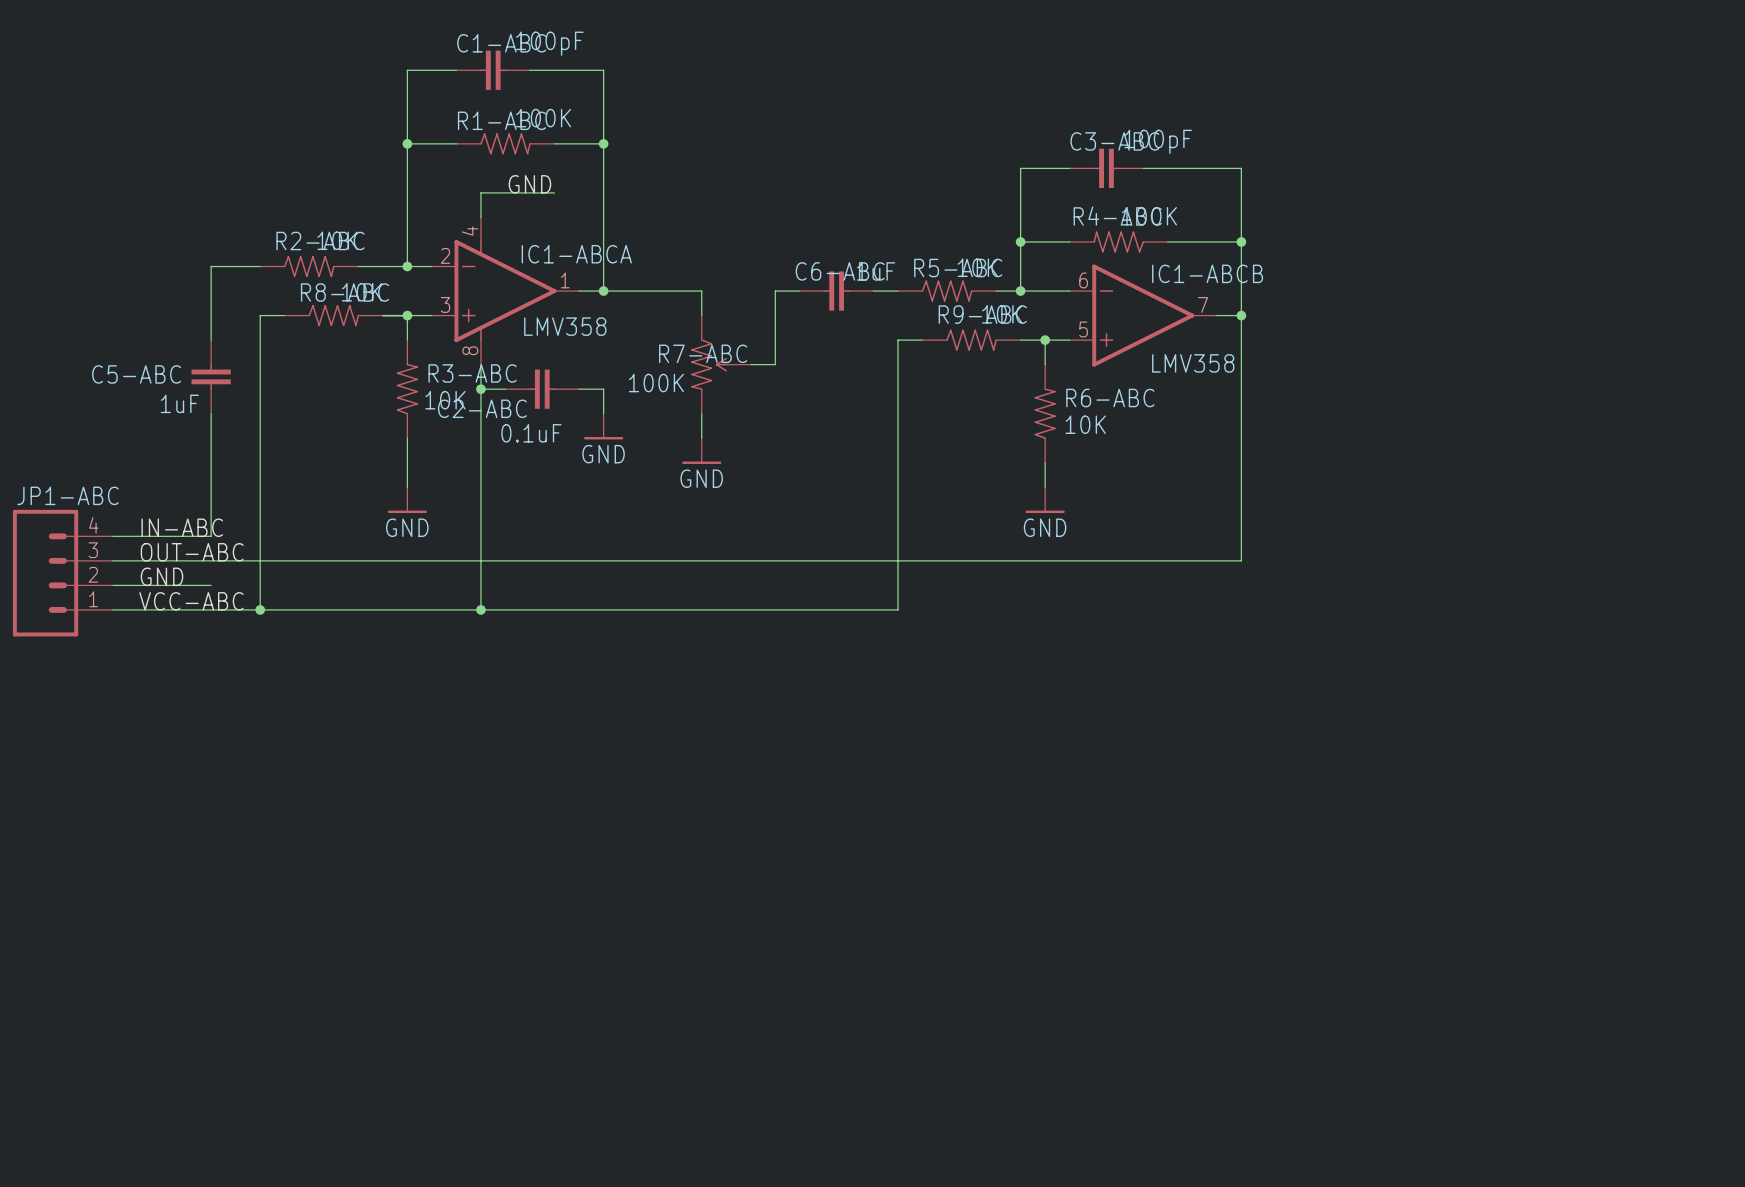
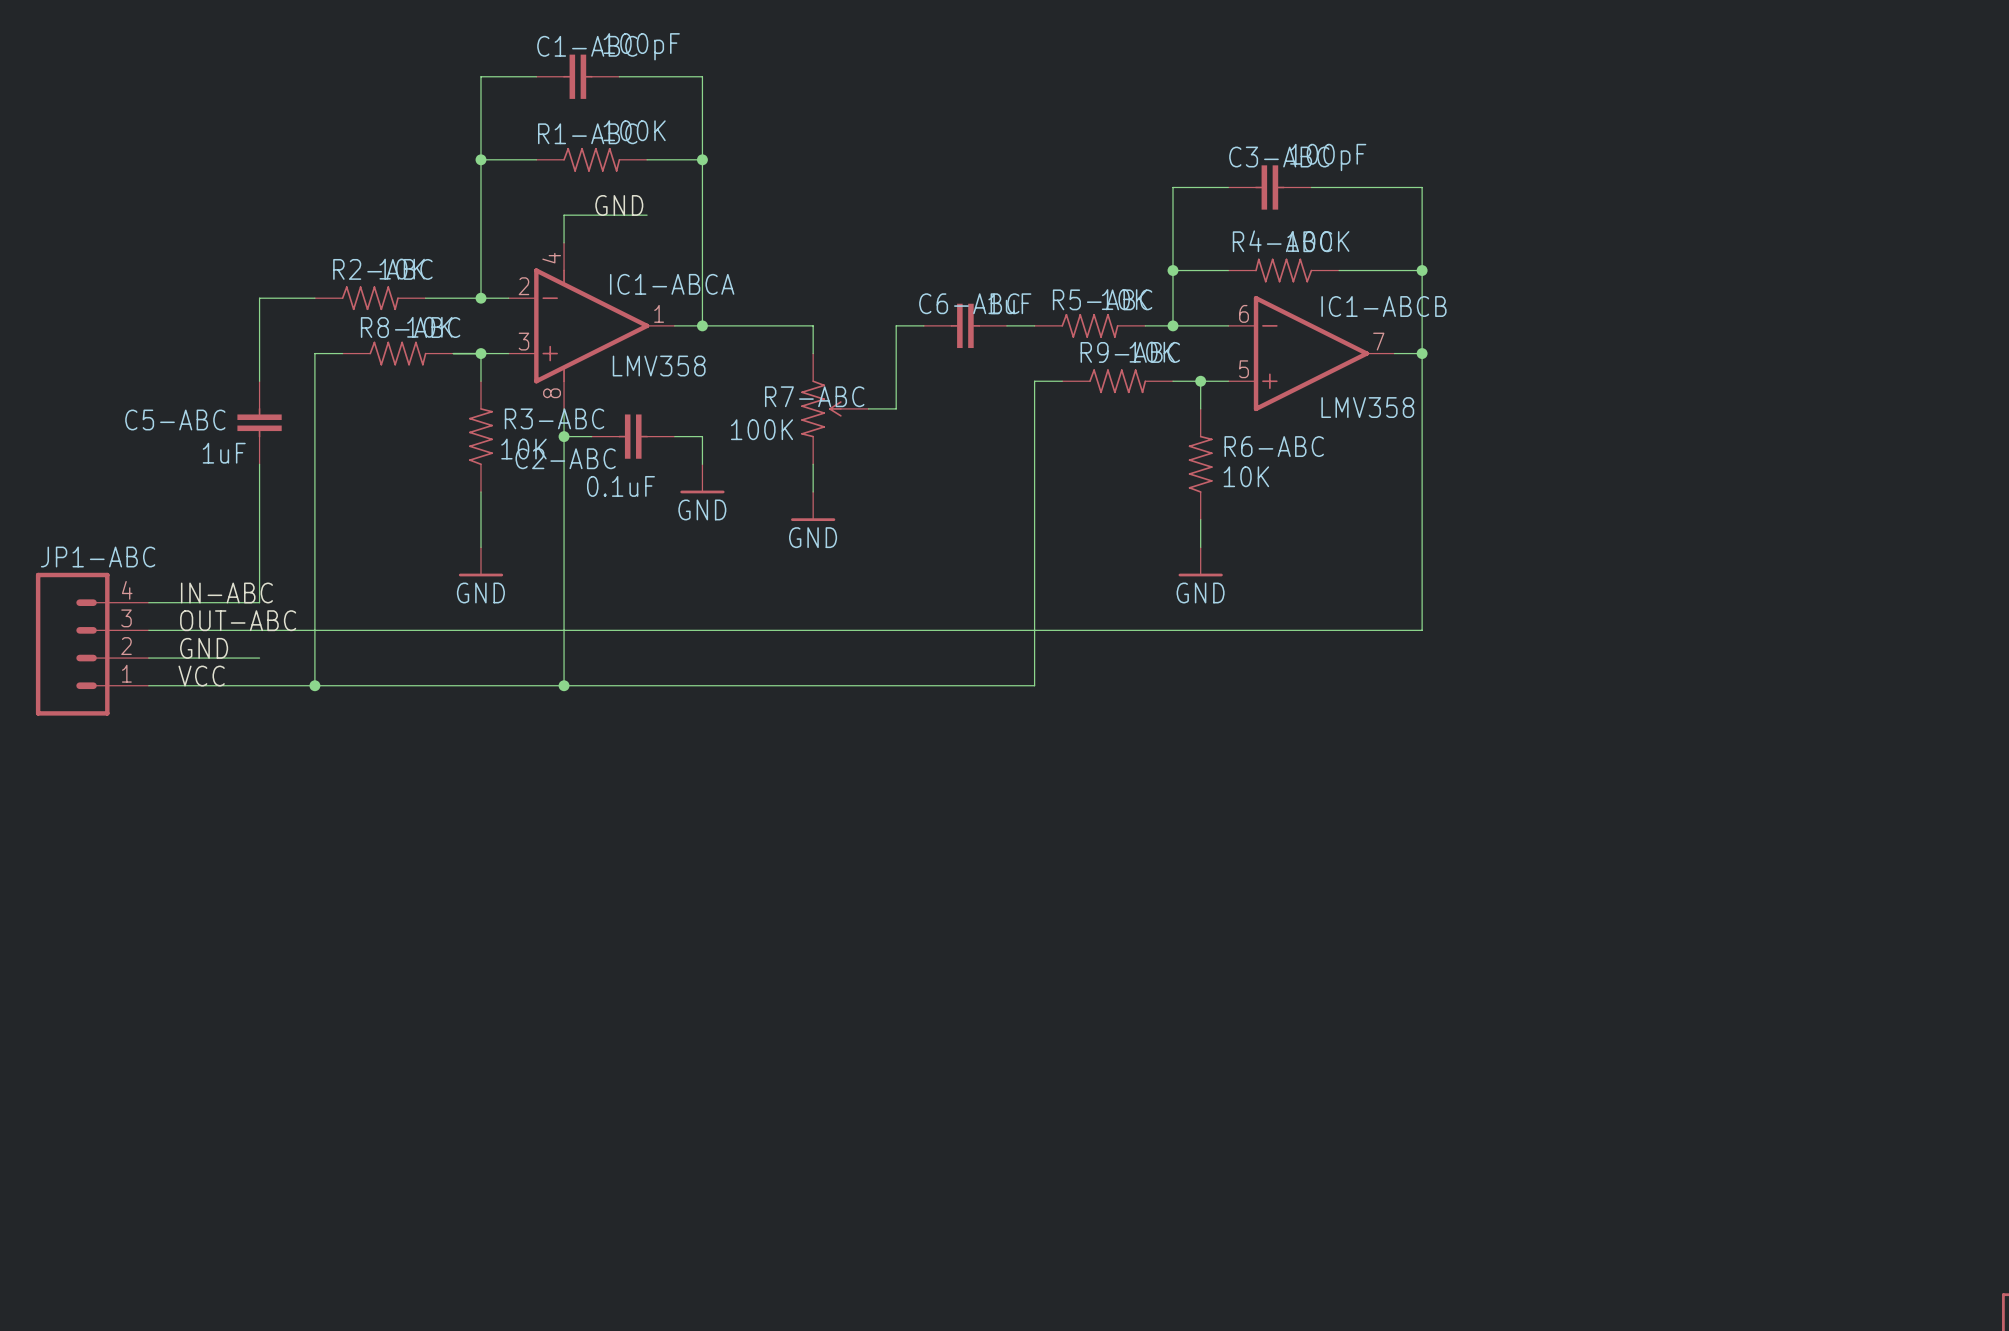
label: VCC-ABC (191, 601) -> VCC (201, 676)

